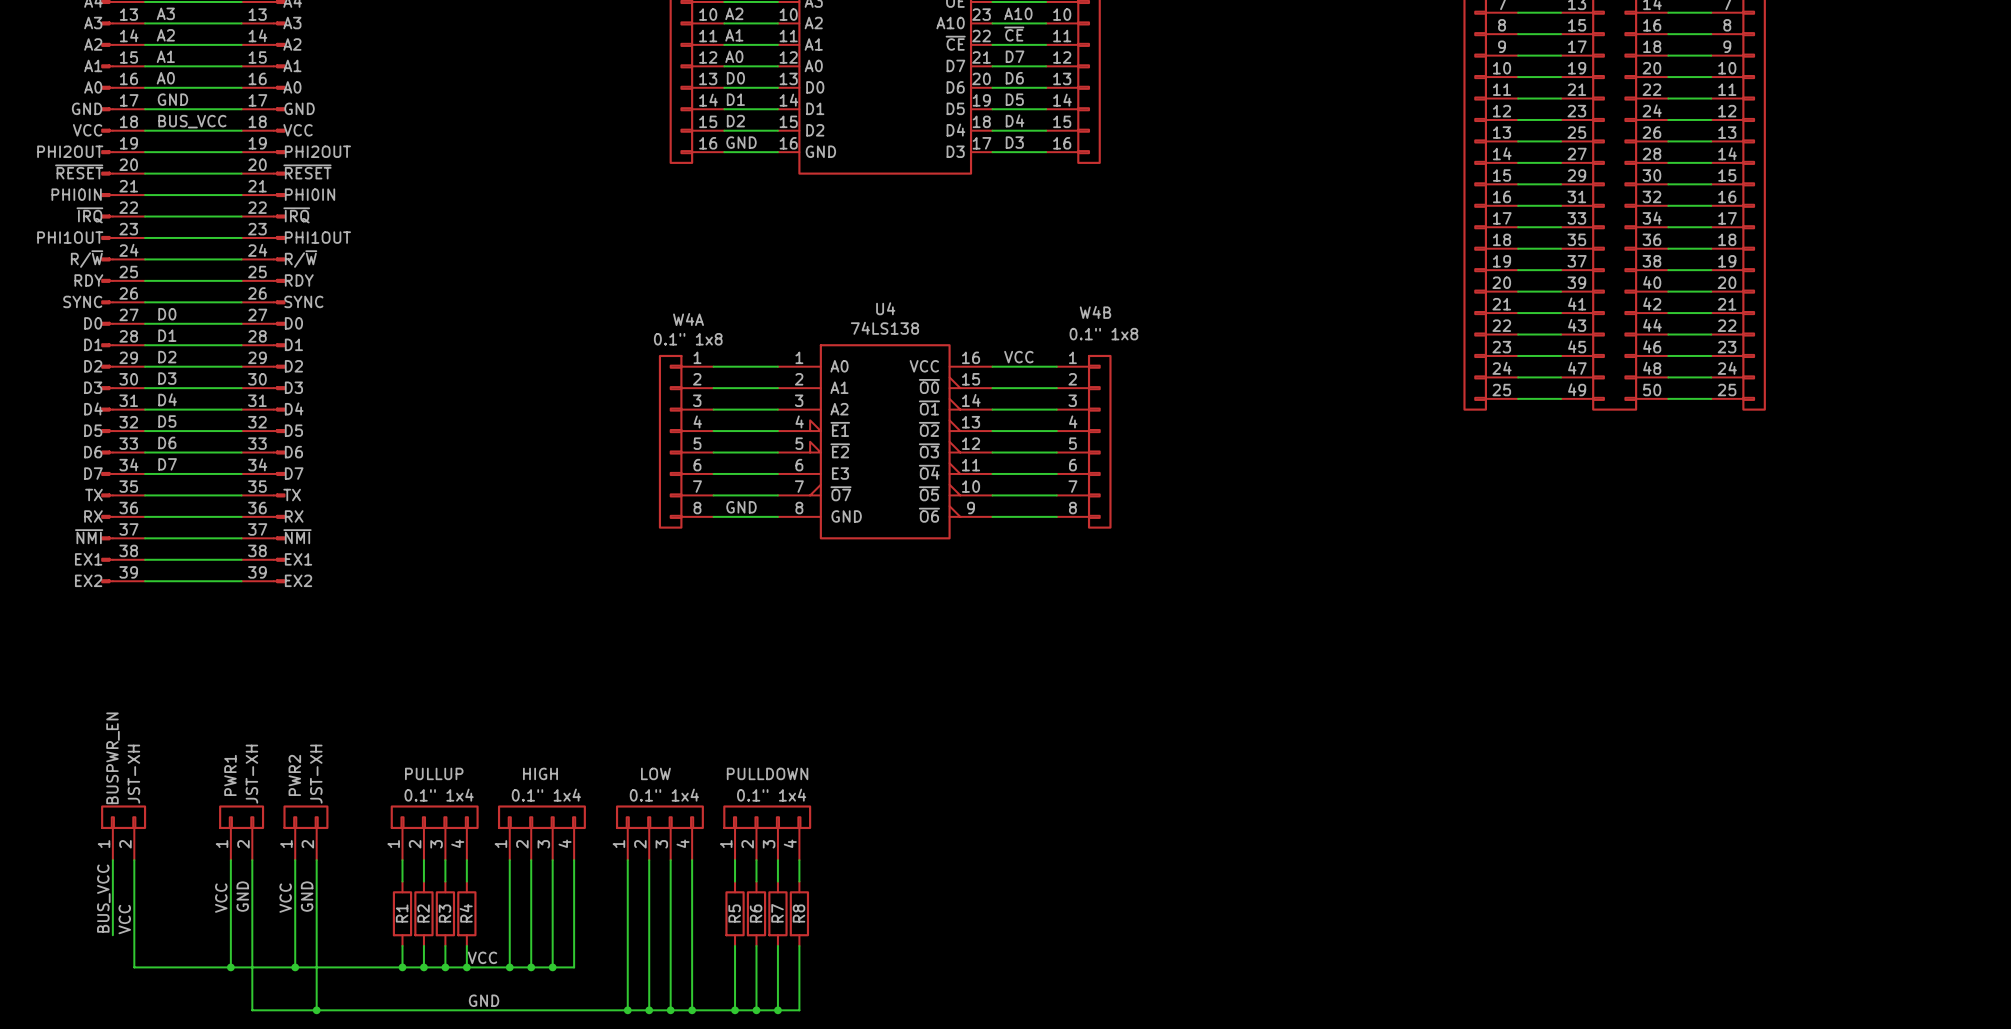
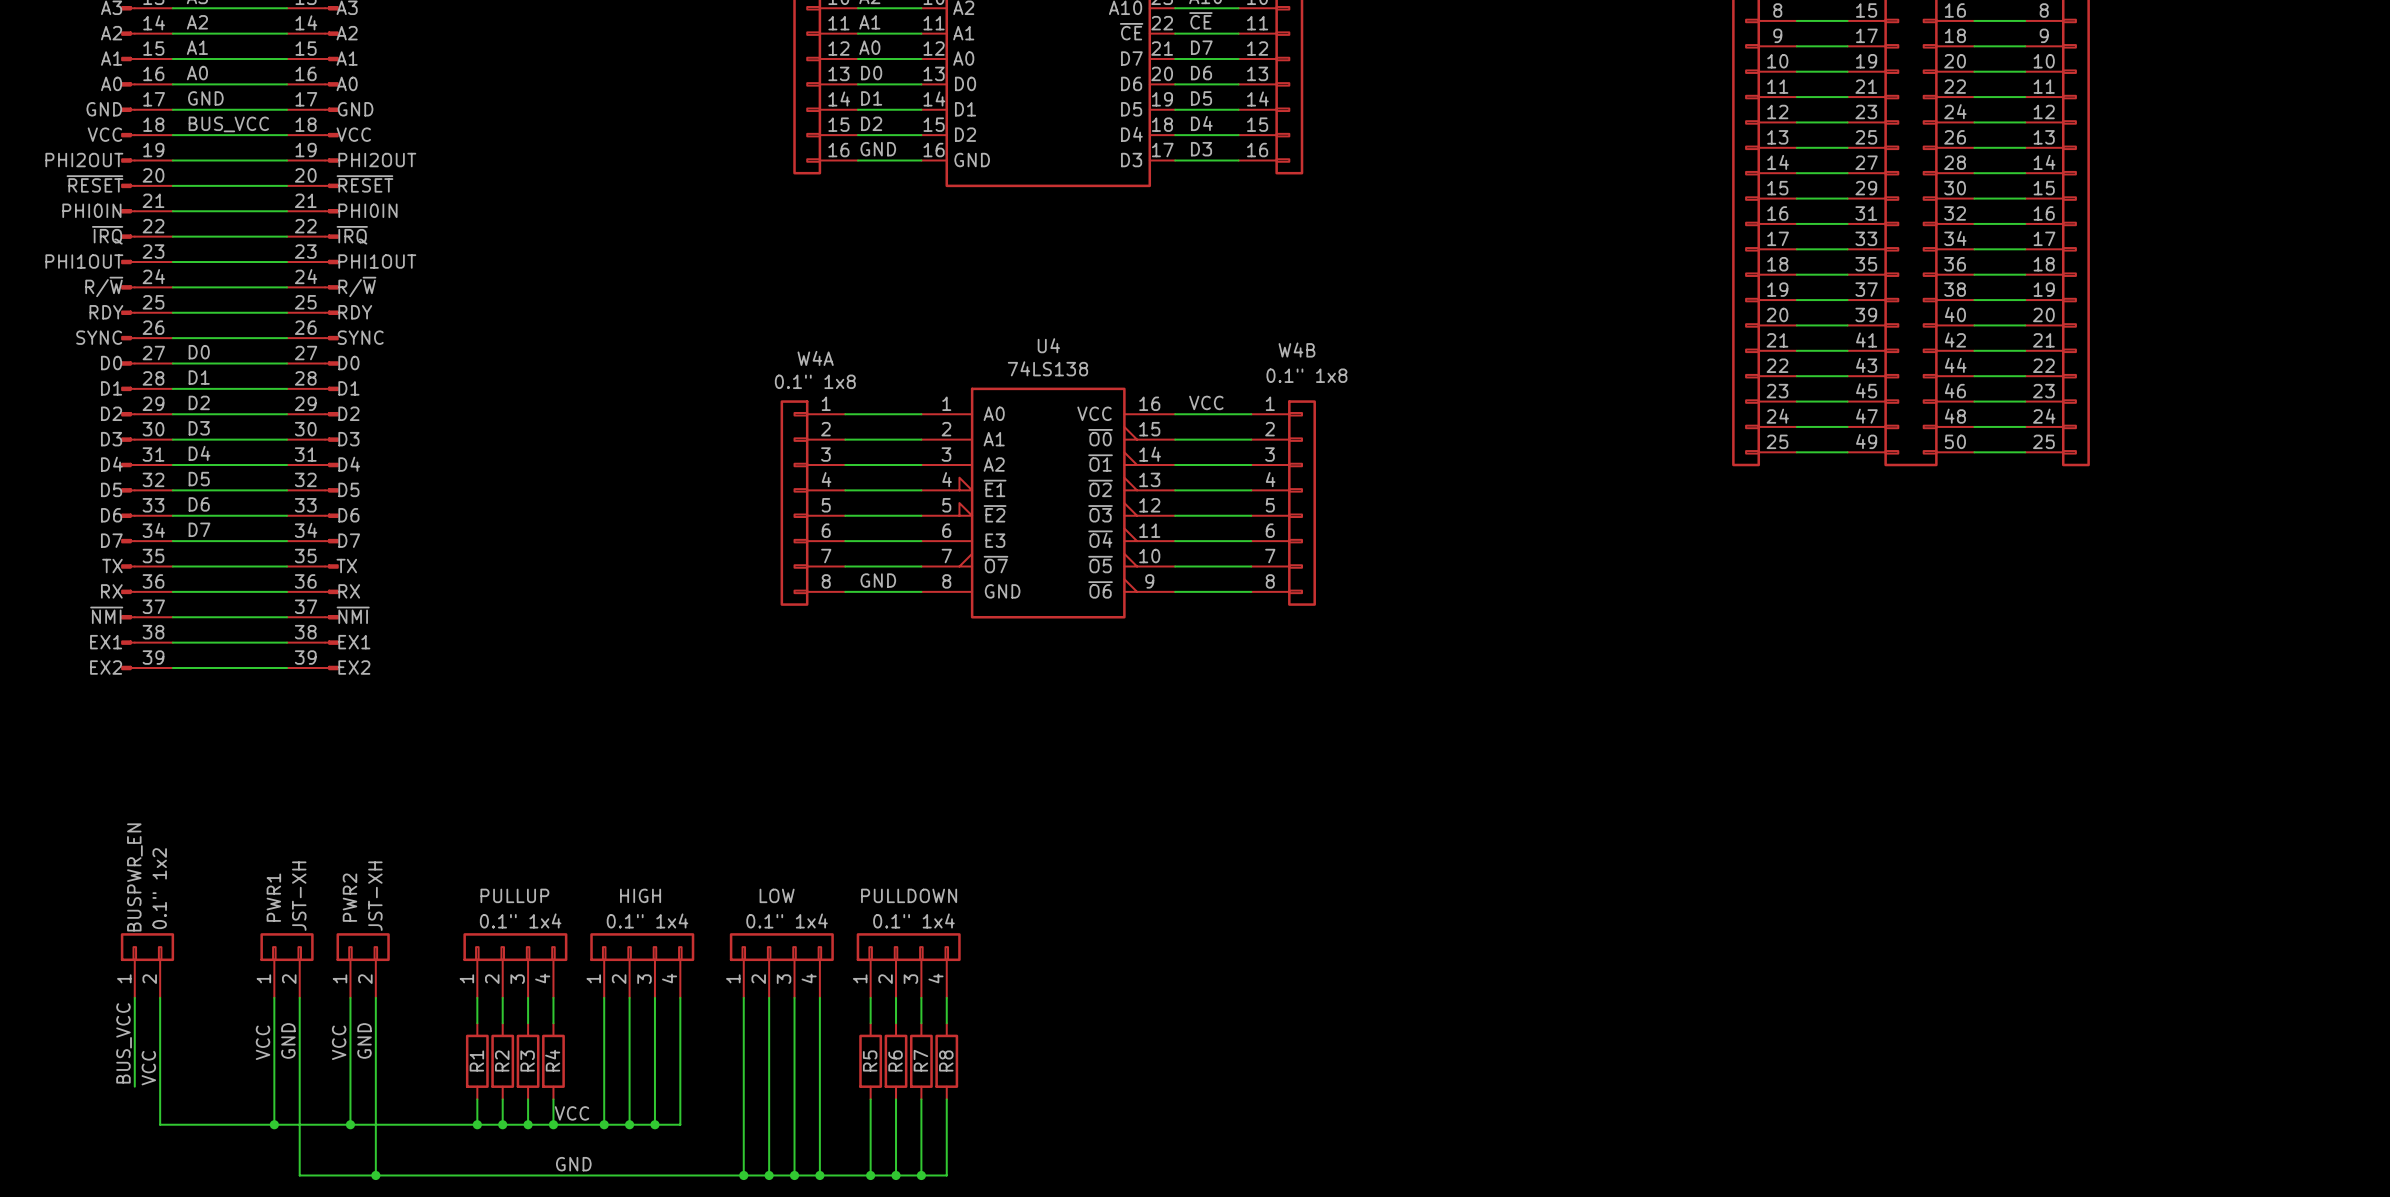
BUSPWR_EN value: JST-XH (133, 774) -> 0.1" 1x2 (159, 888)

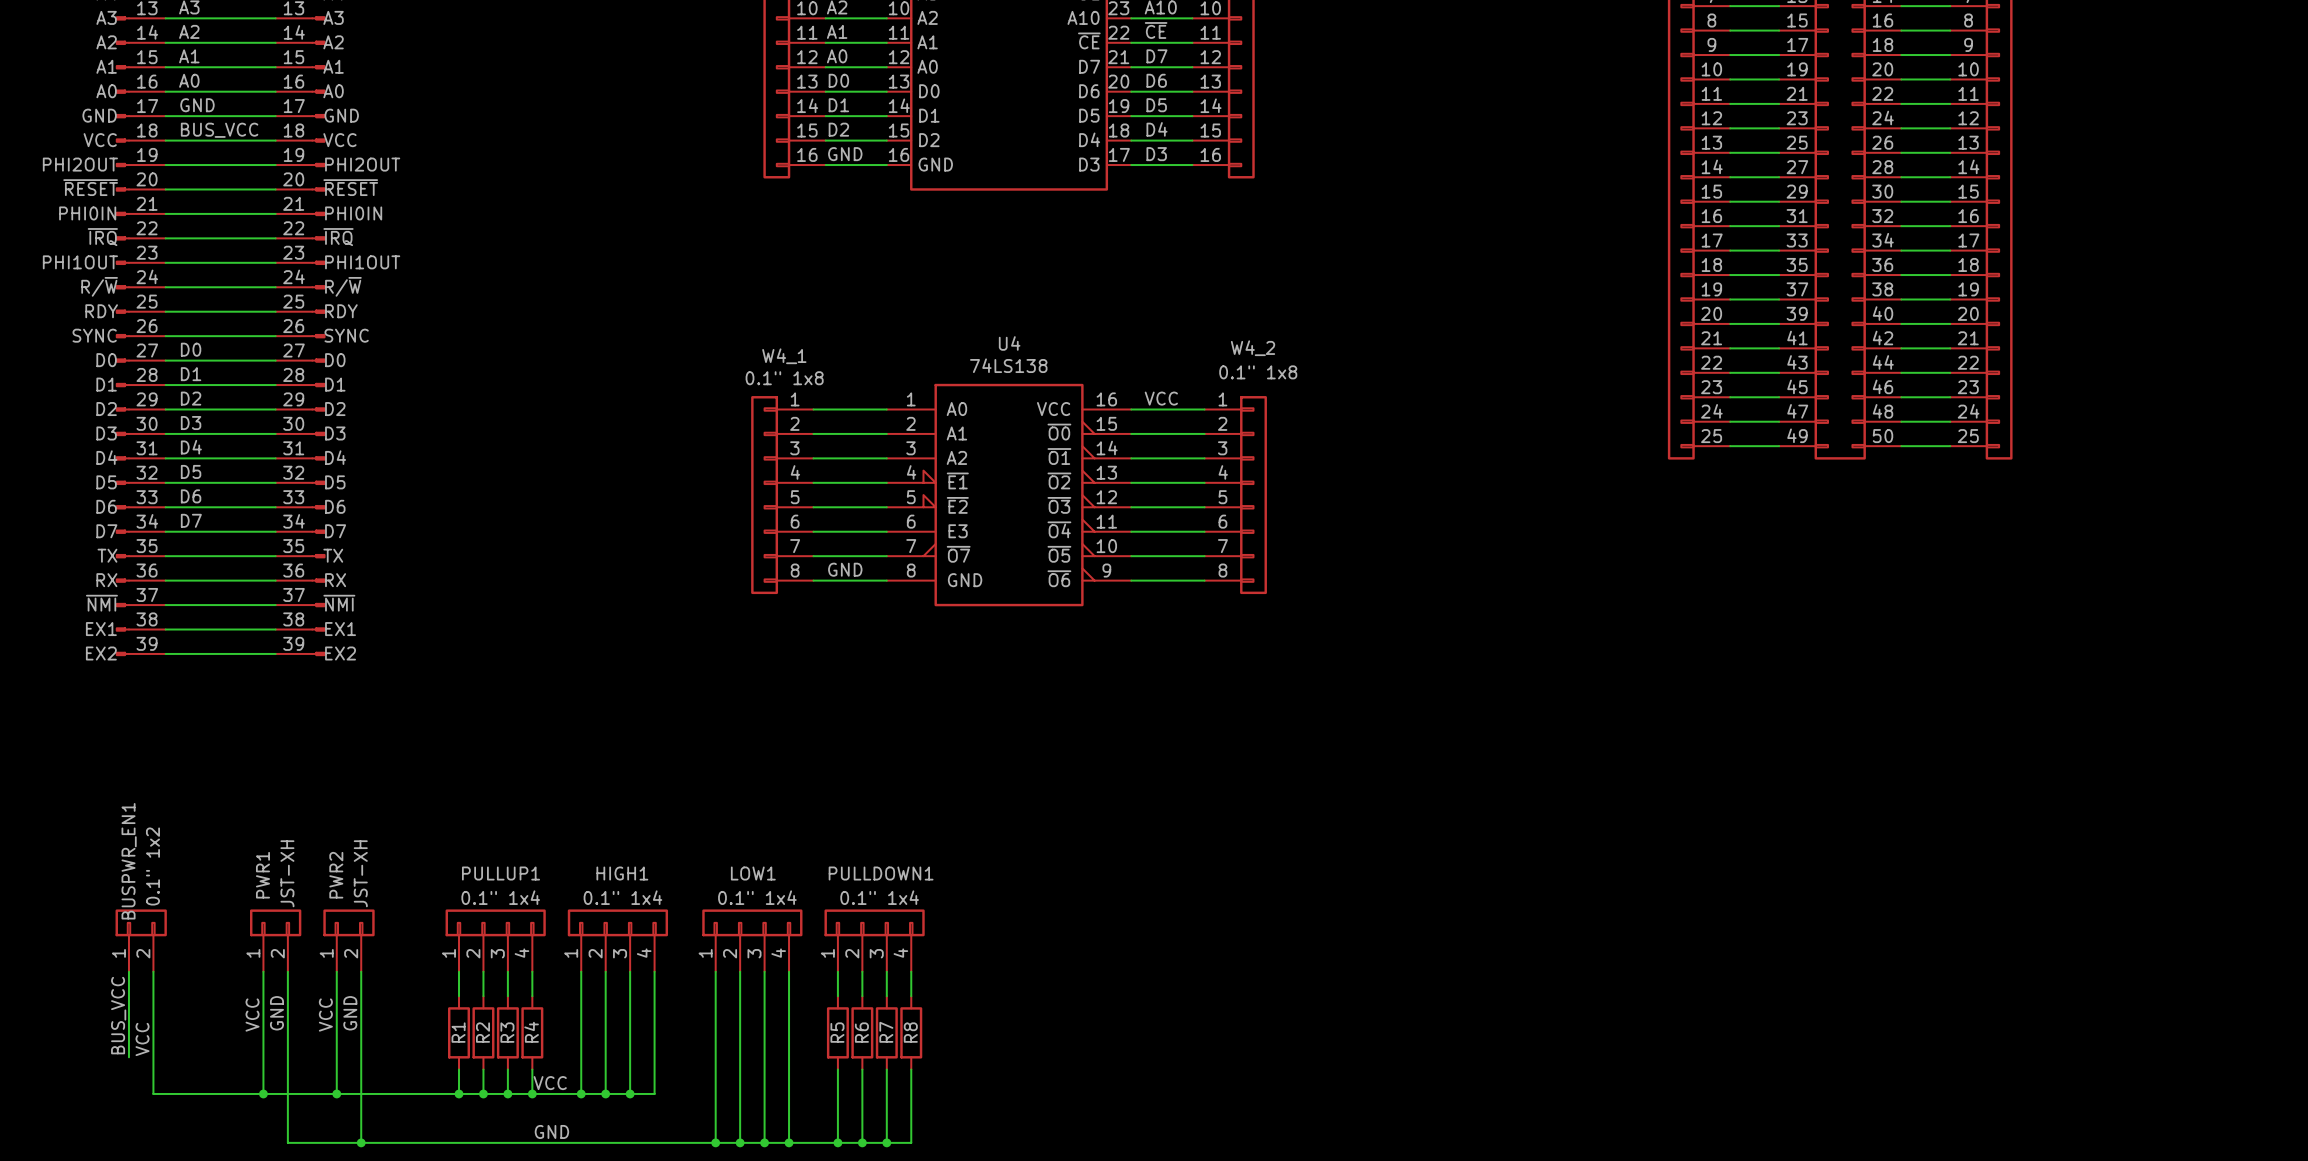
W4B name: W4B (1296, 350) -> W4_2 (1253, 348)
W4A name: W4A (815, 358) -> W4_1 (784, 356)
BUSPWR_EN name: BUSPWR_EN (134, 877) -> BUSPWR_EN1 (129, 861)
PULLUP name: PULLUP (514, 895) -> PULLUP1 (501, 873)
HIGH name: HIGH (640, 895) -> HIGH1 (622, 873)
LOW name: LOW (777, 895) -> LOW1 (753, 873)
PULLDOWN name: PULLDOWN (909, 895) -> PULLDOWN1 (881, 873)

